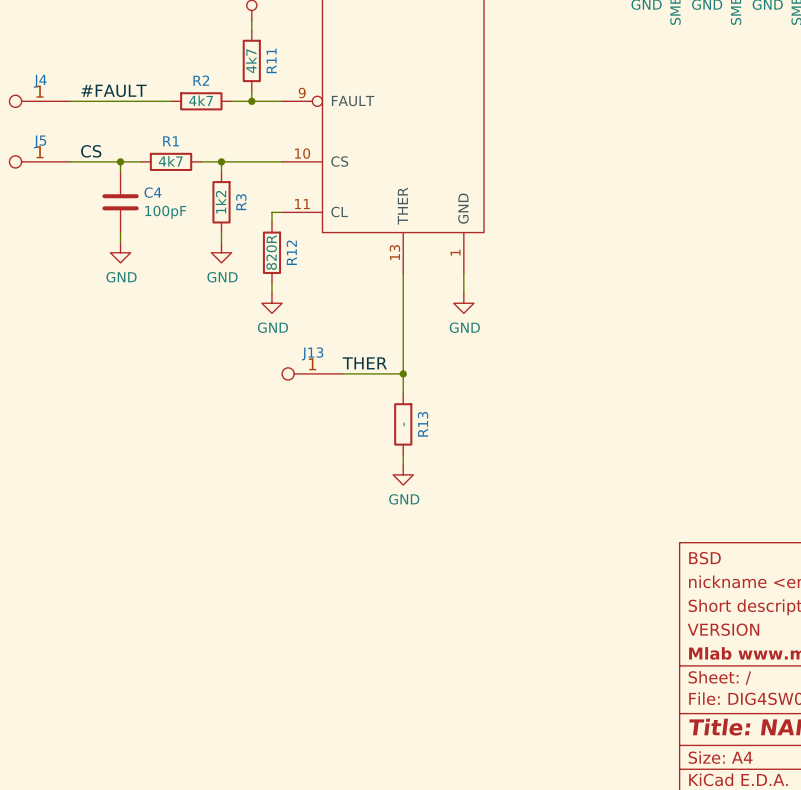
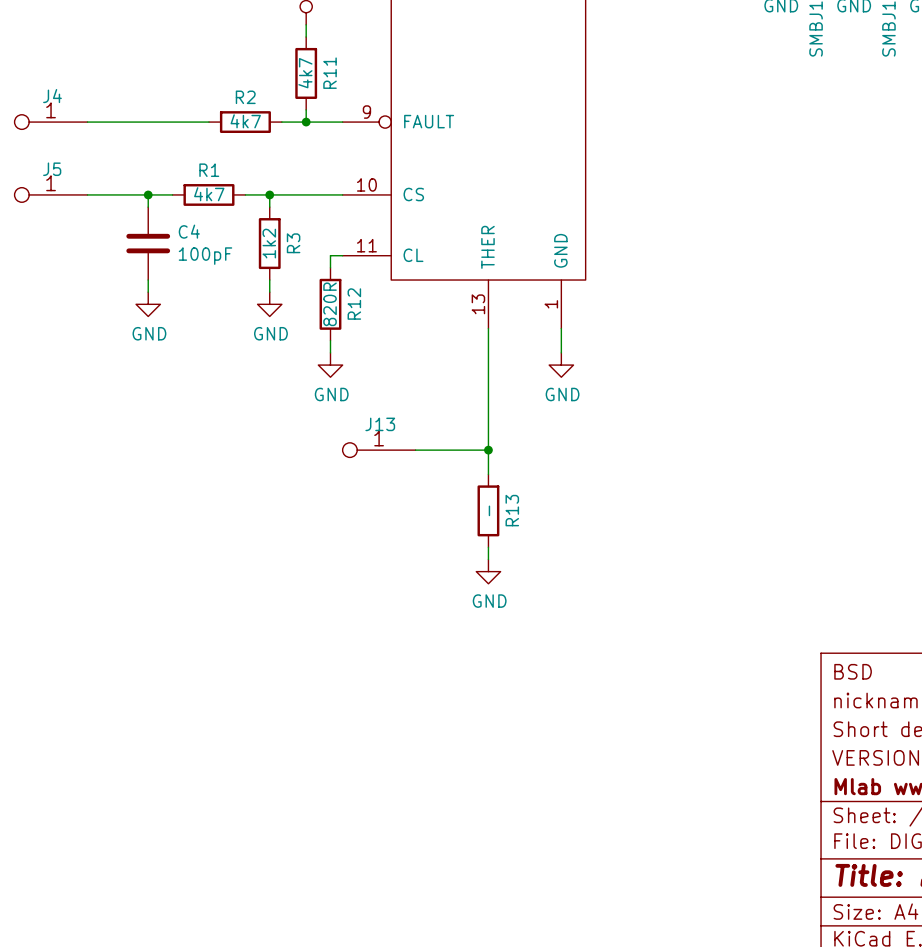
label: #FAULT (114, 90) -> none
label: CS (91, 151) -> none
label: THER (364, 363) -> none

